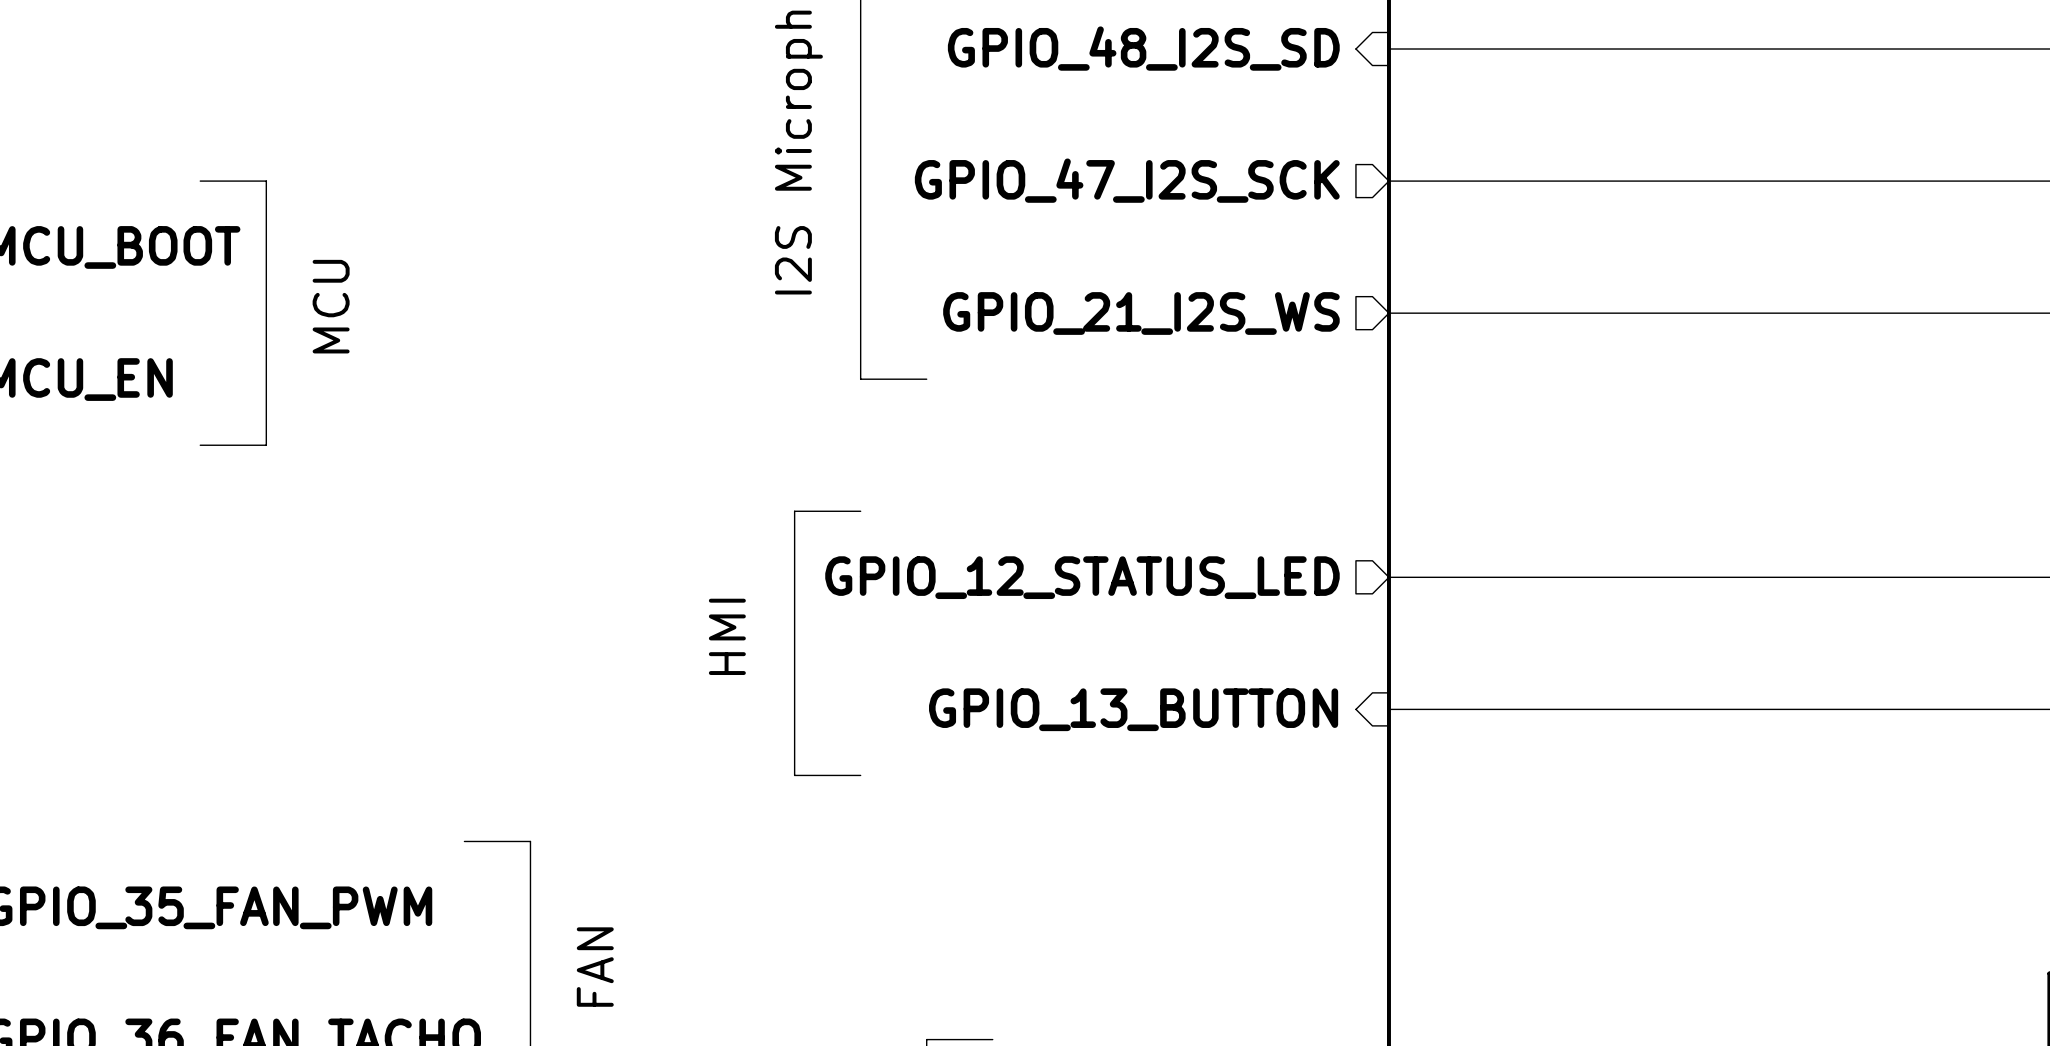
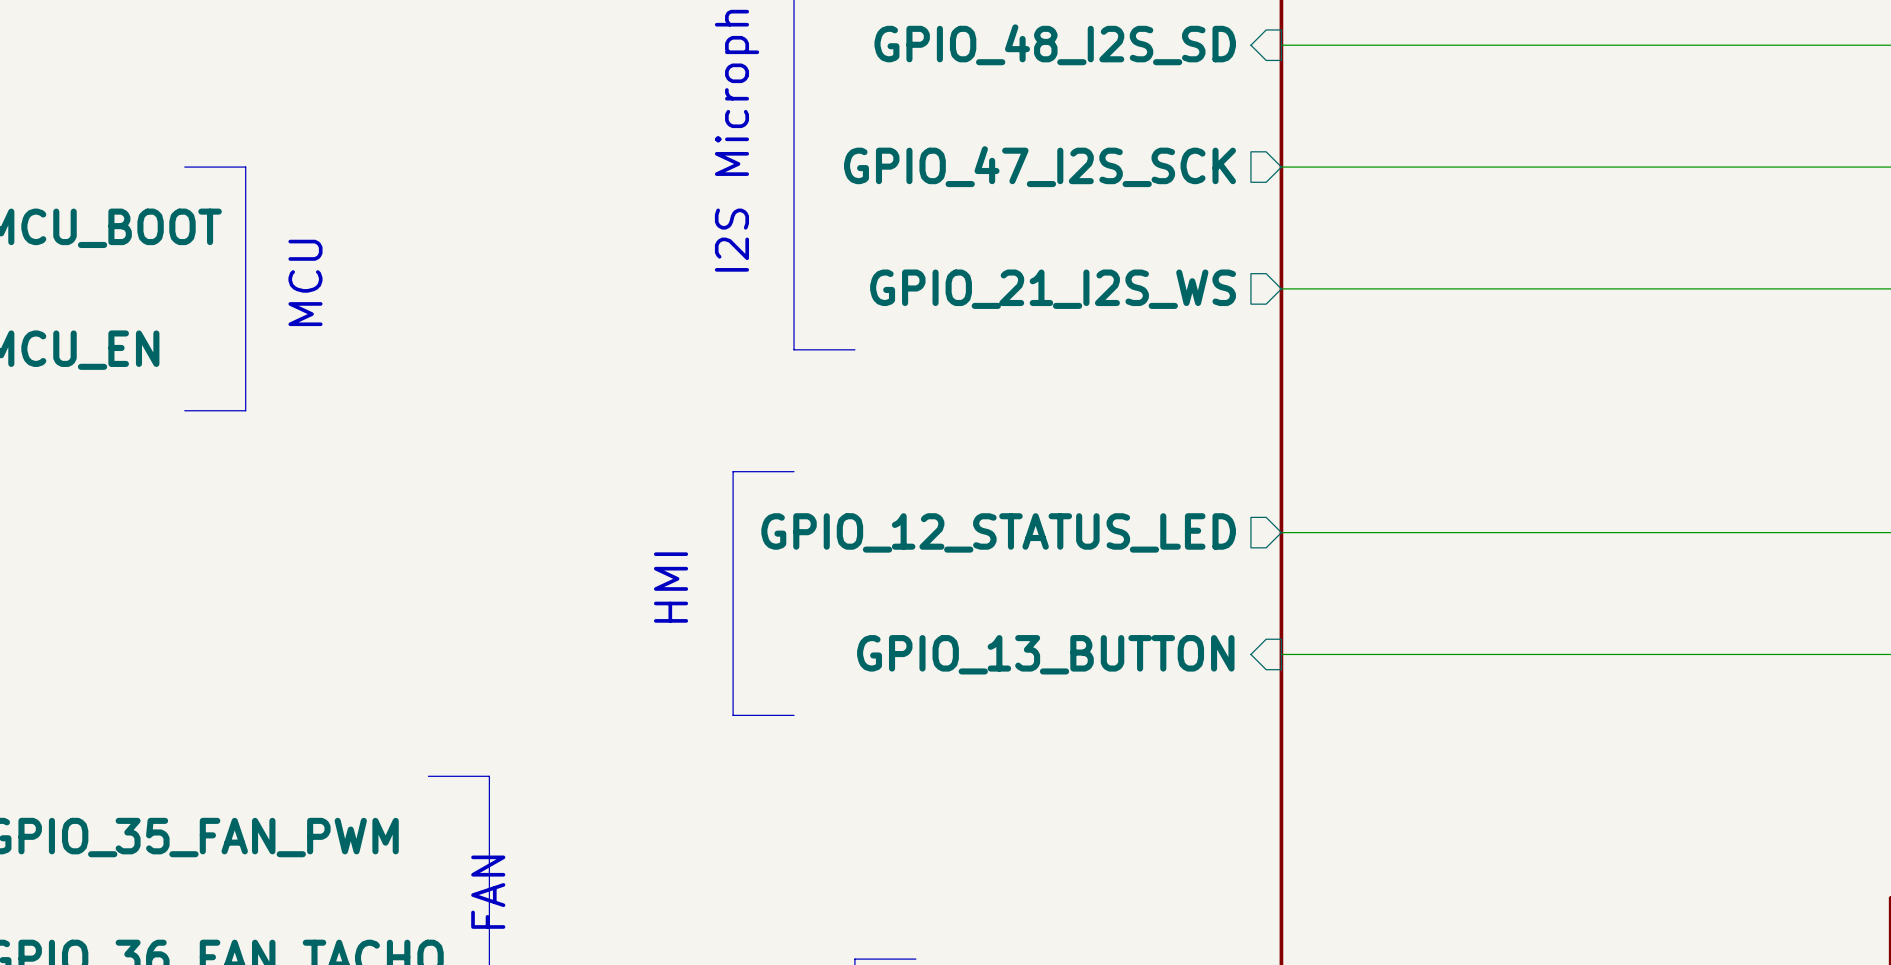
text position: FAN (595, 967) -> FAN (488, 892)

